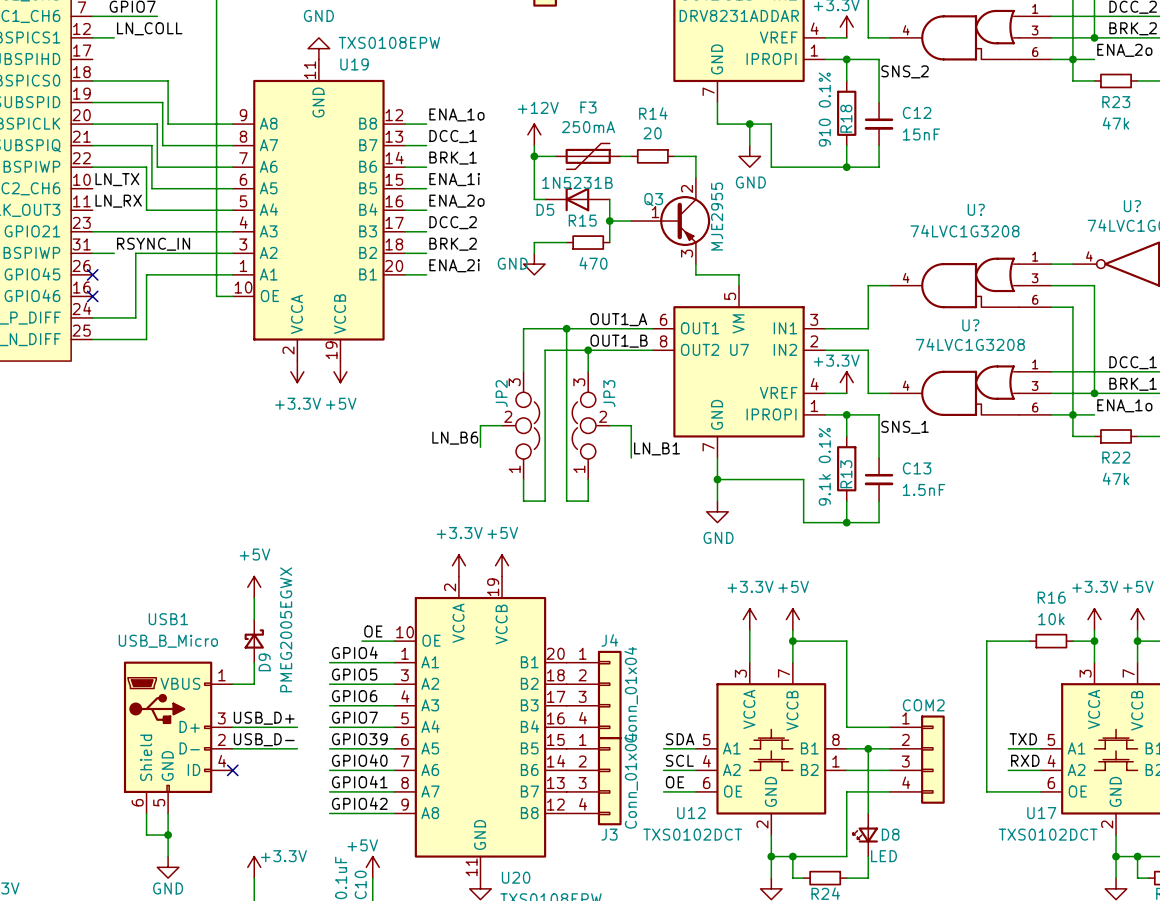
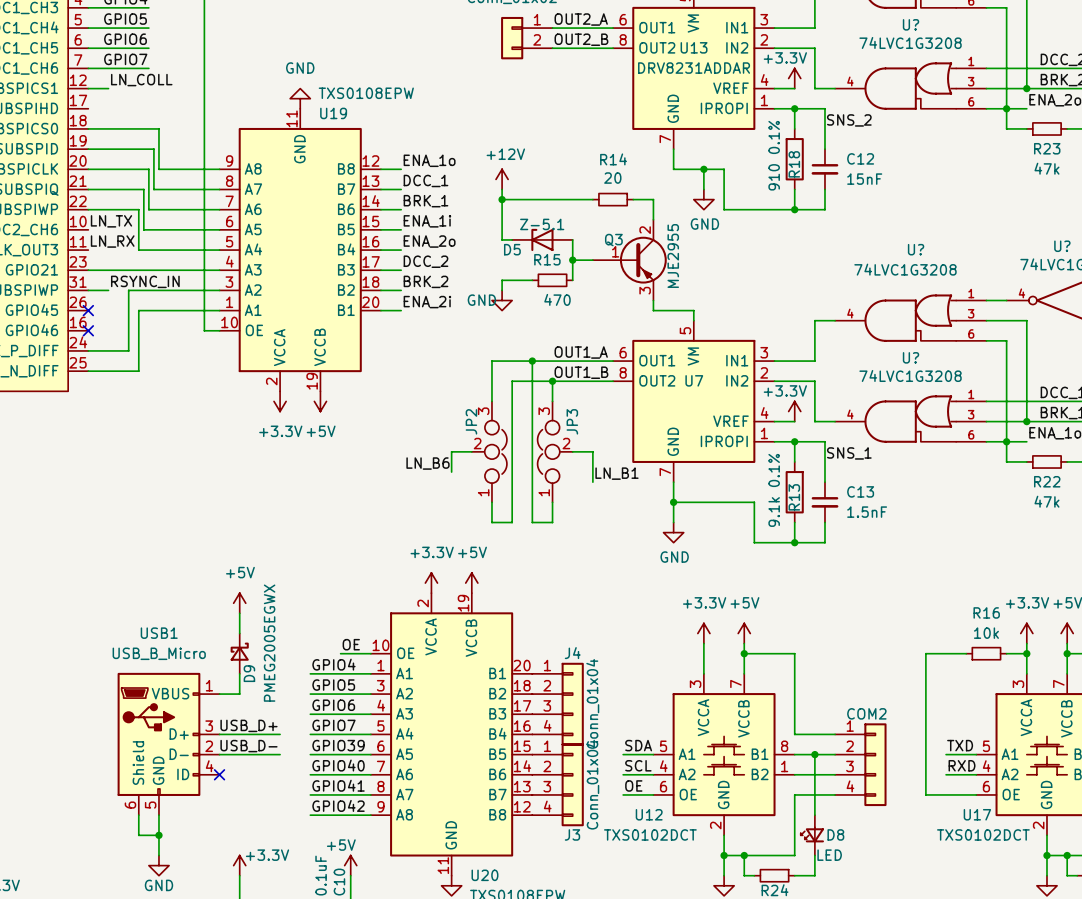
F3: 250mA (588, 156) -> none
D5 value: 1N5231B (577, 182) -> Z-5.1 (542, 224)

